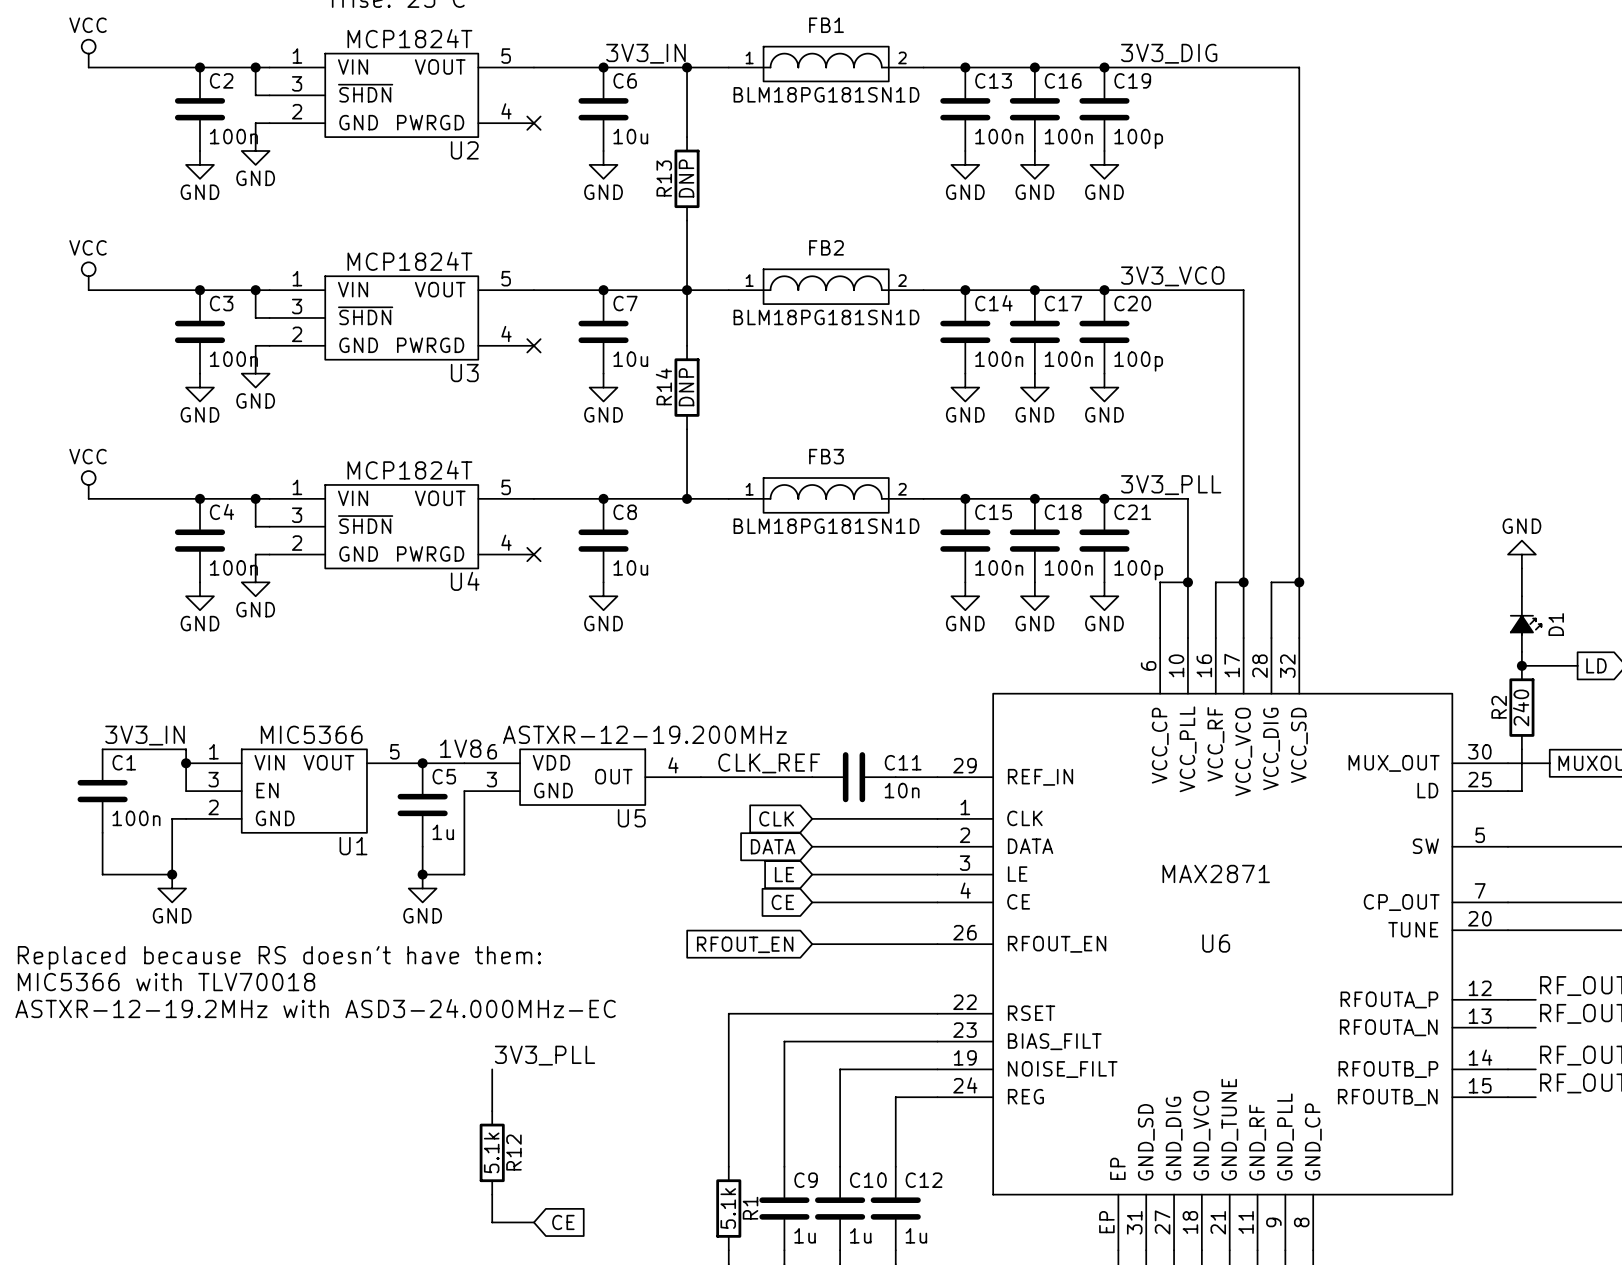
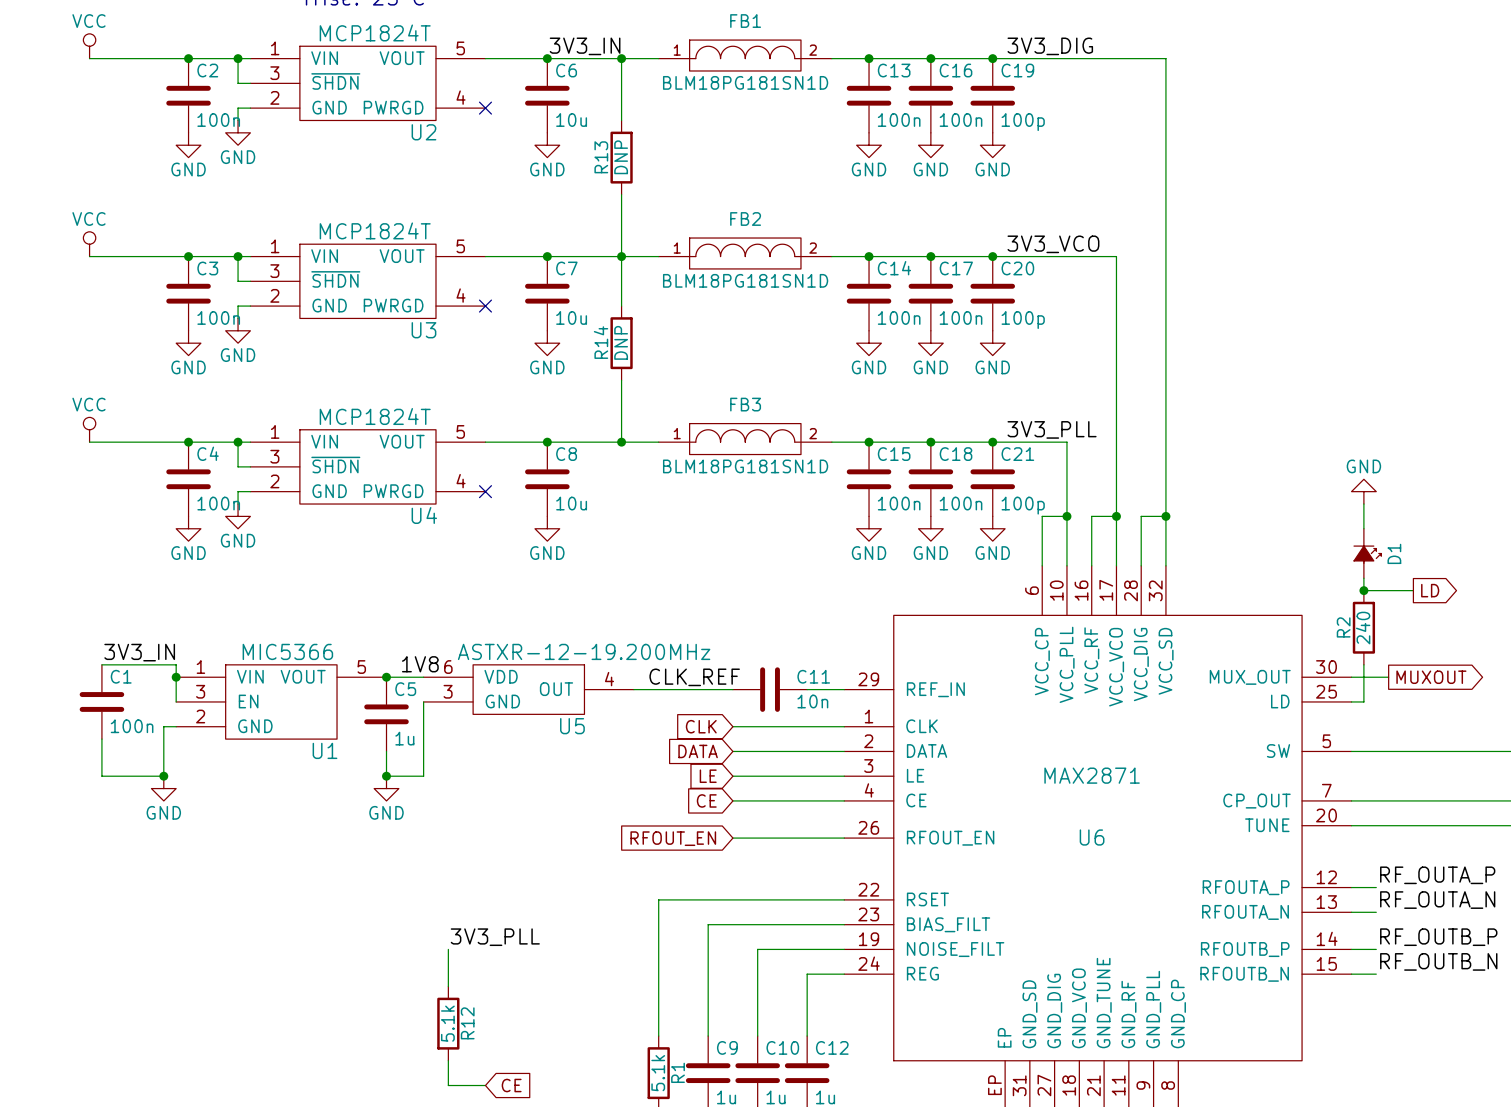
text: Replaced because RS doesn't have them: (279, 957) -> none
text: MIC5366 with TLV70018 (166, 982) -> none
text: ASTXR-12-19.2MHz with ASD3-24.000MHz-EC (315, 1008) -> none

